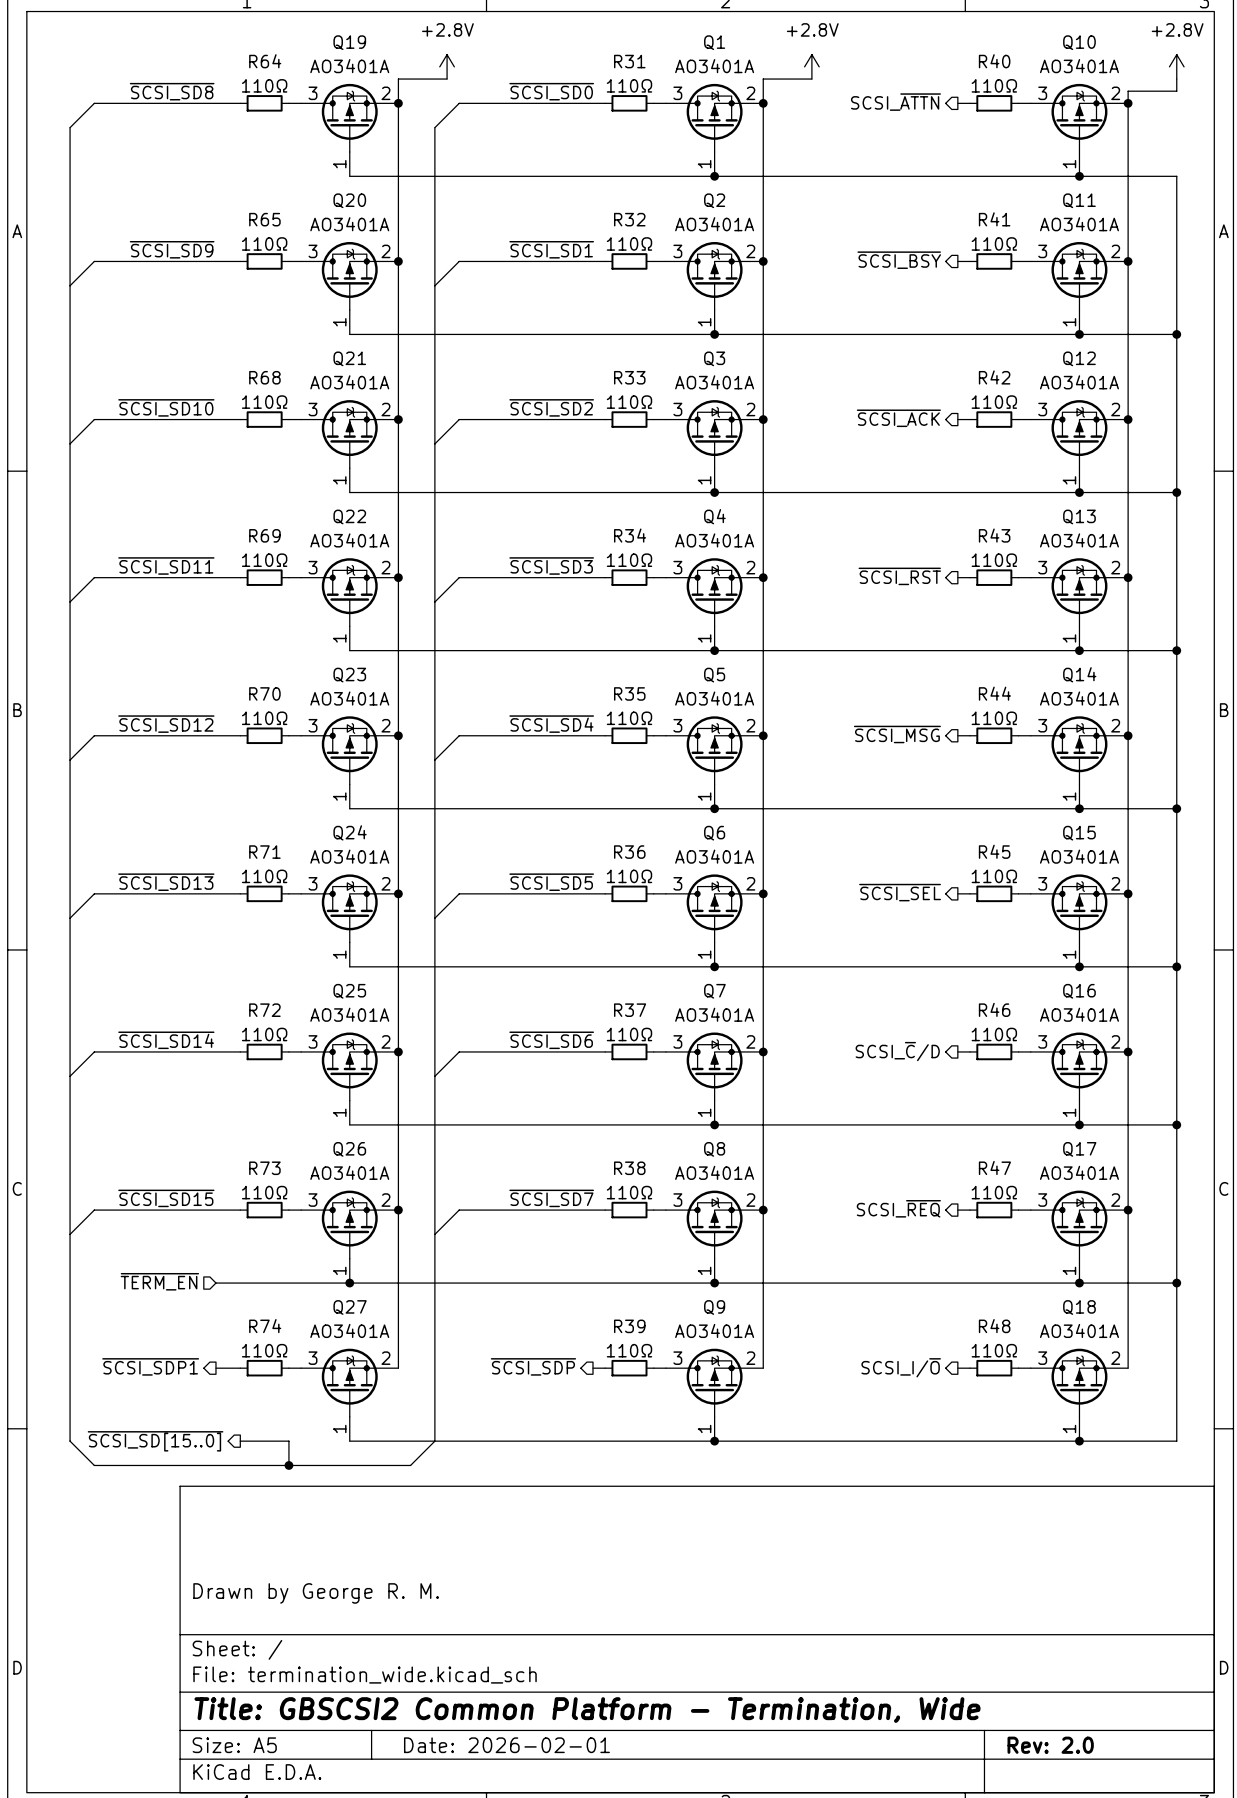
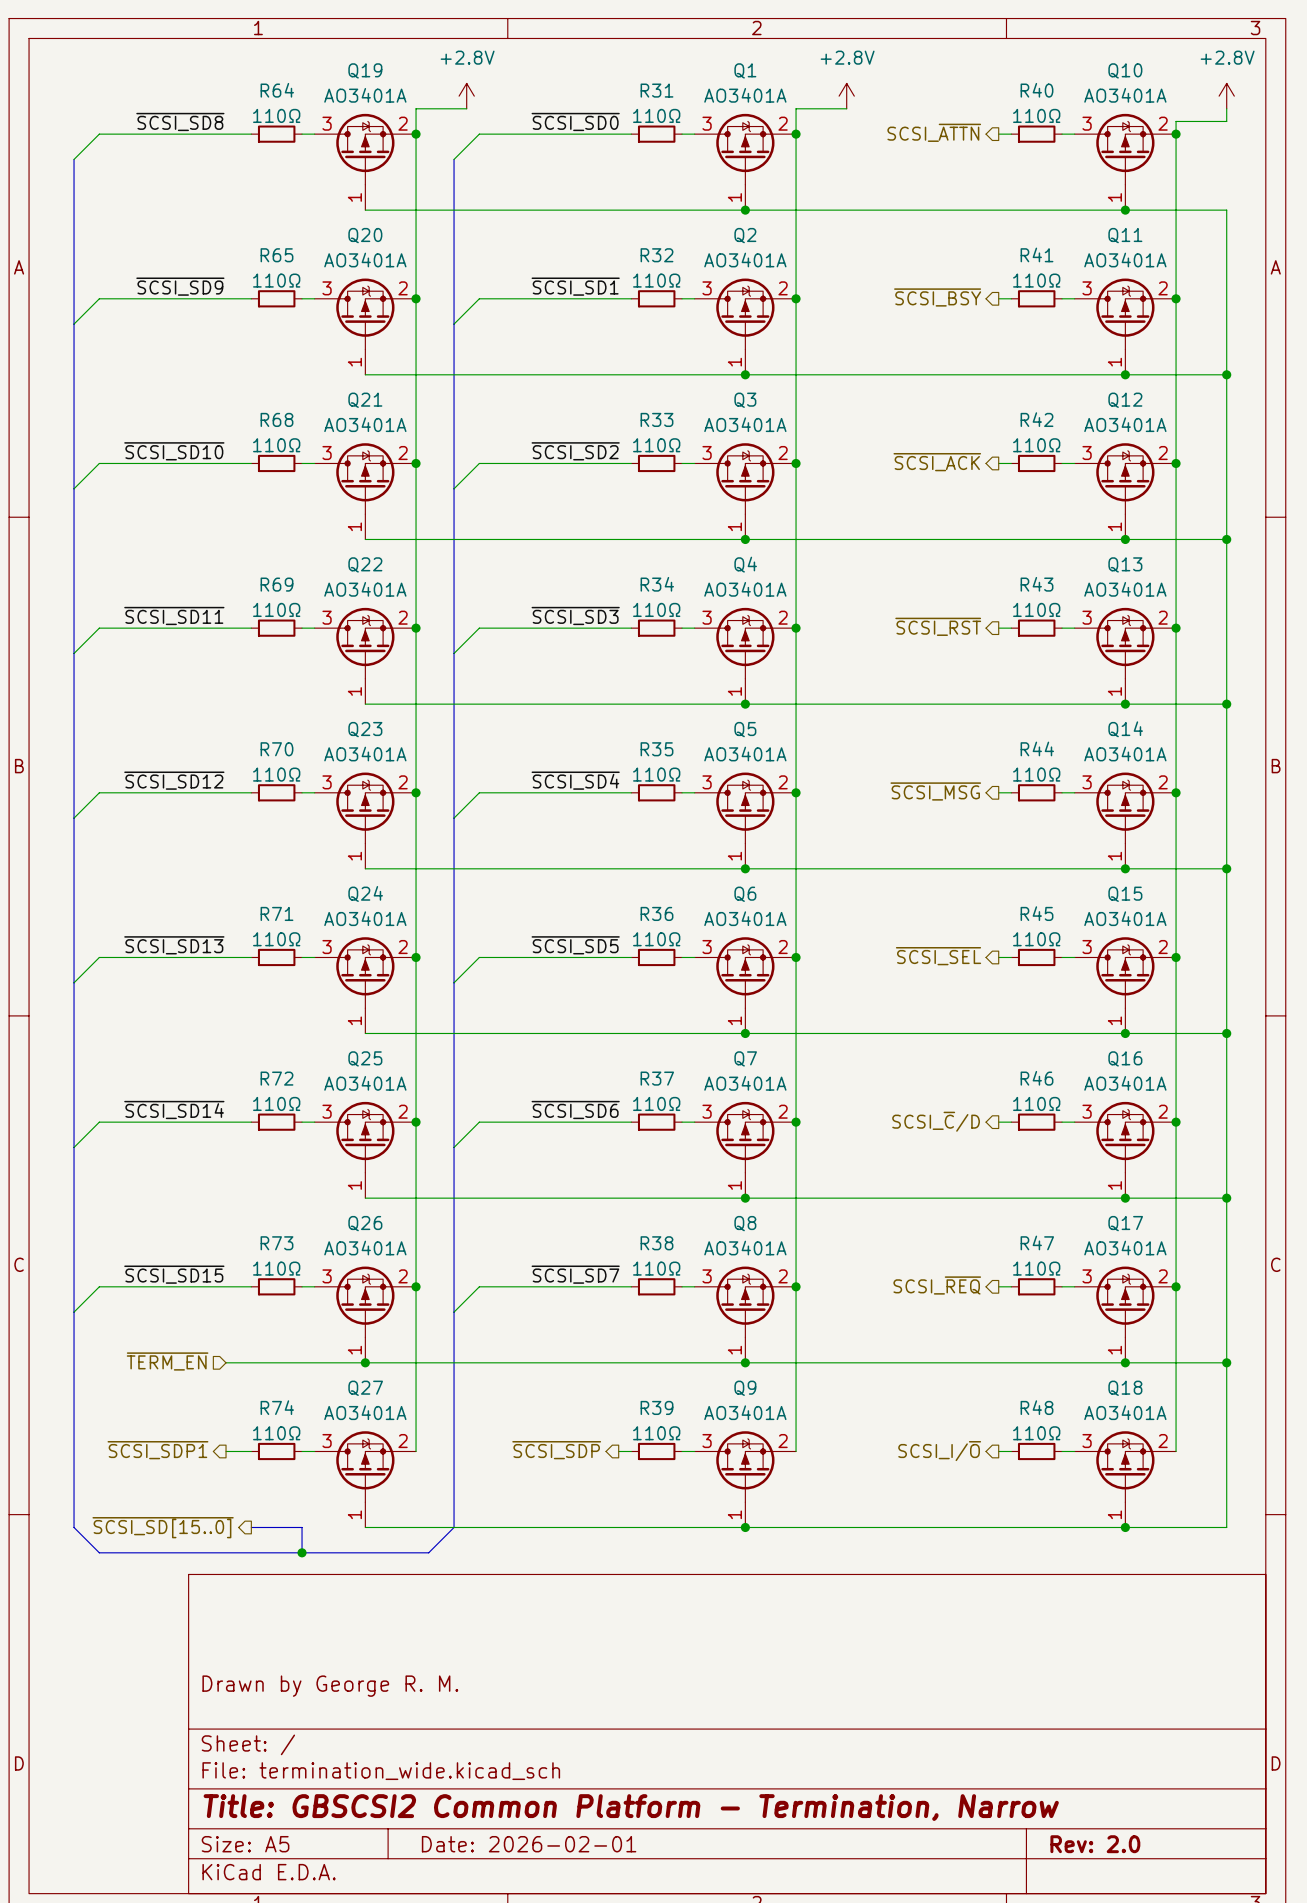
title block: Title: GBSCSI2 Common Platform - Termination, Wide (587, 1710) -> Title: GBSCSI2 Common Platform - Termination, Narrow (631, 1807)

